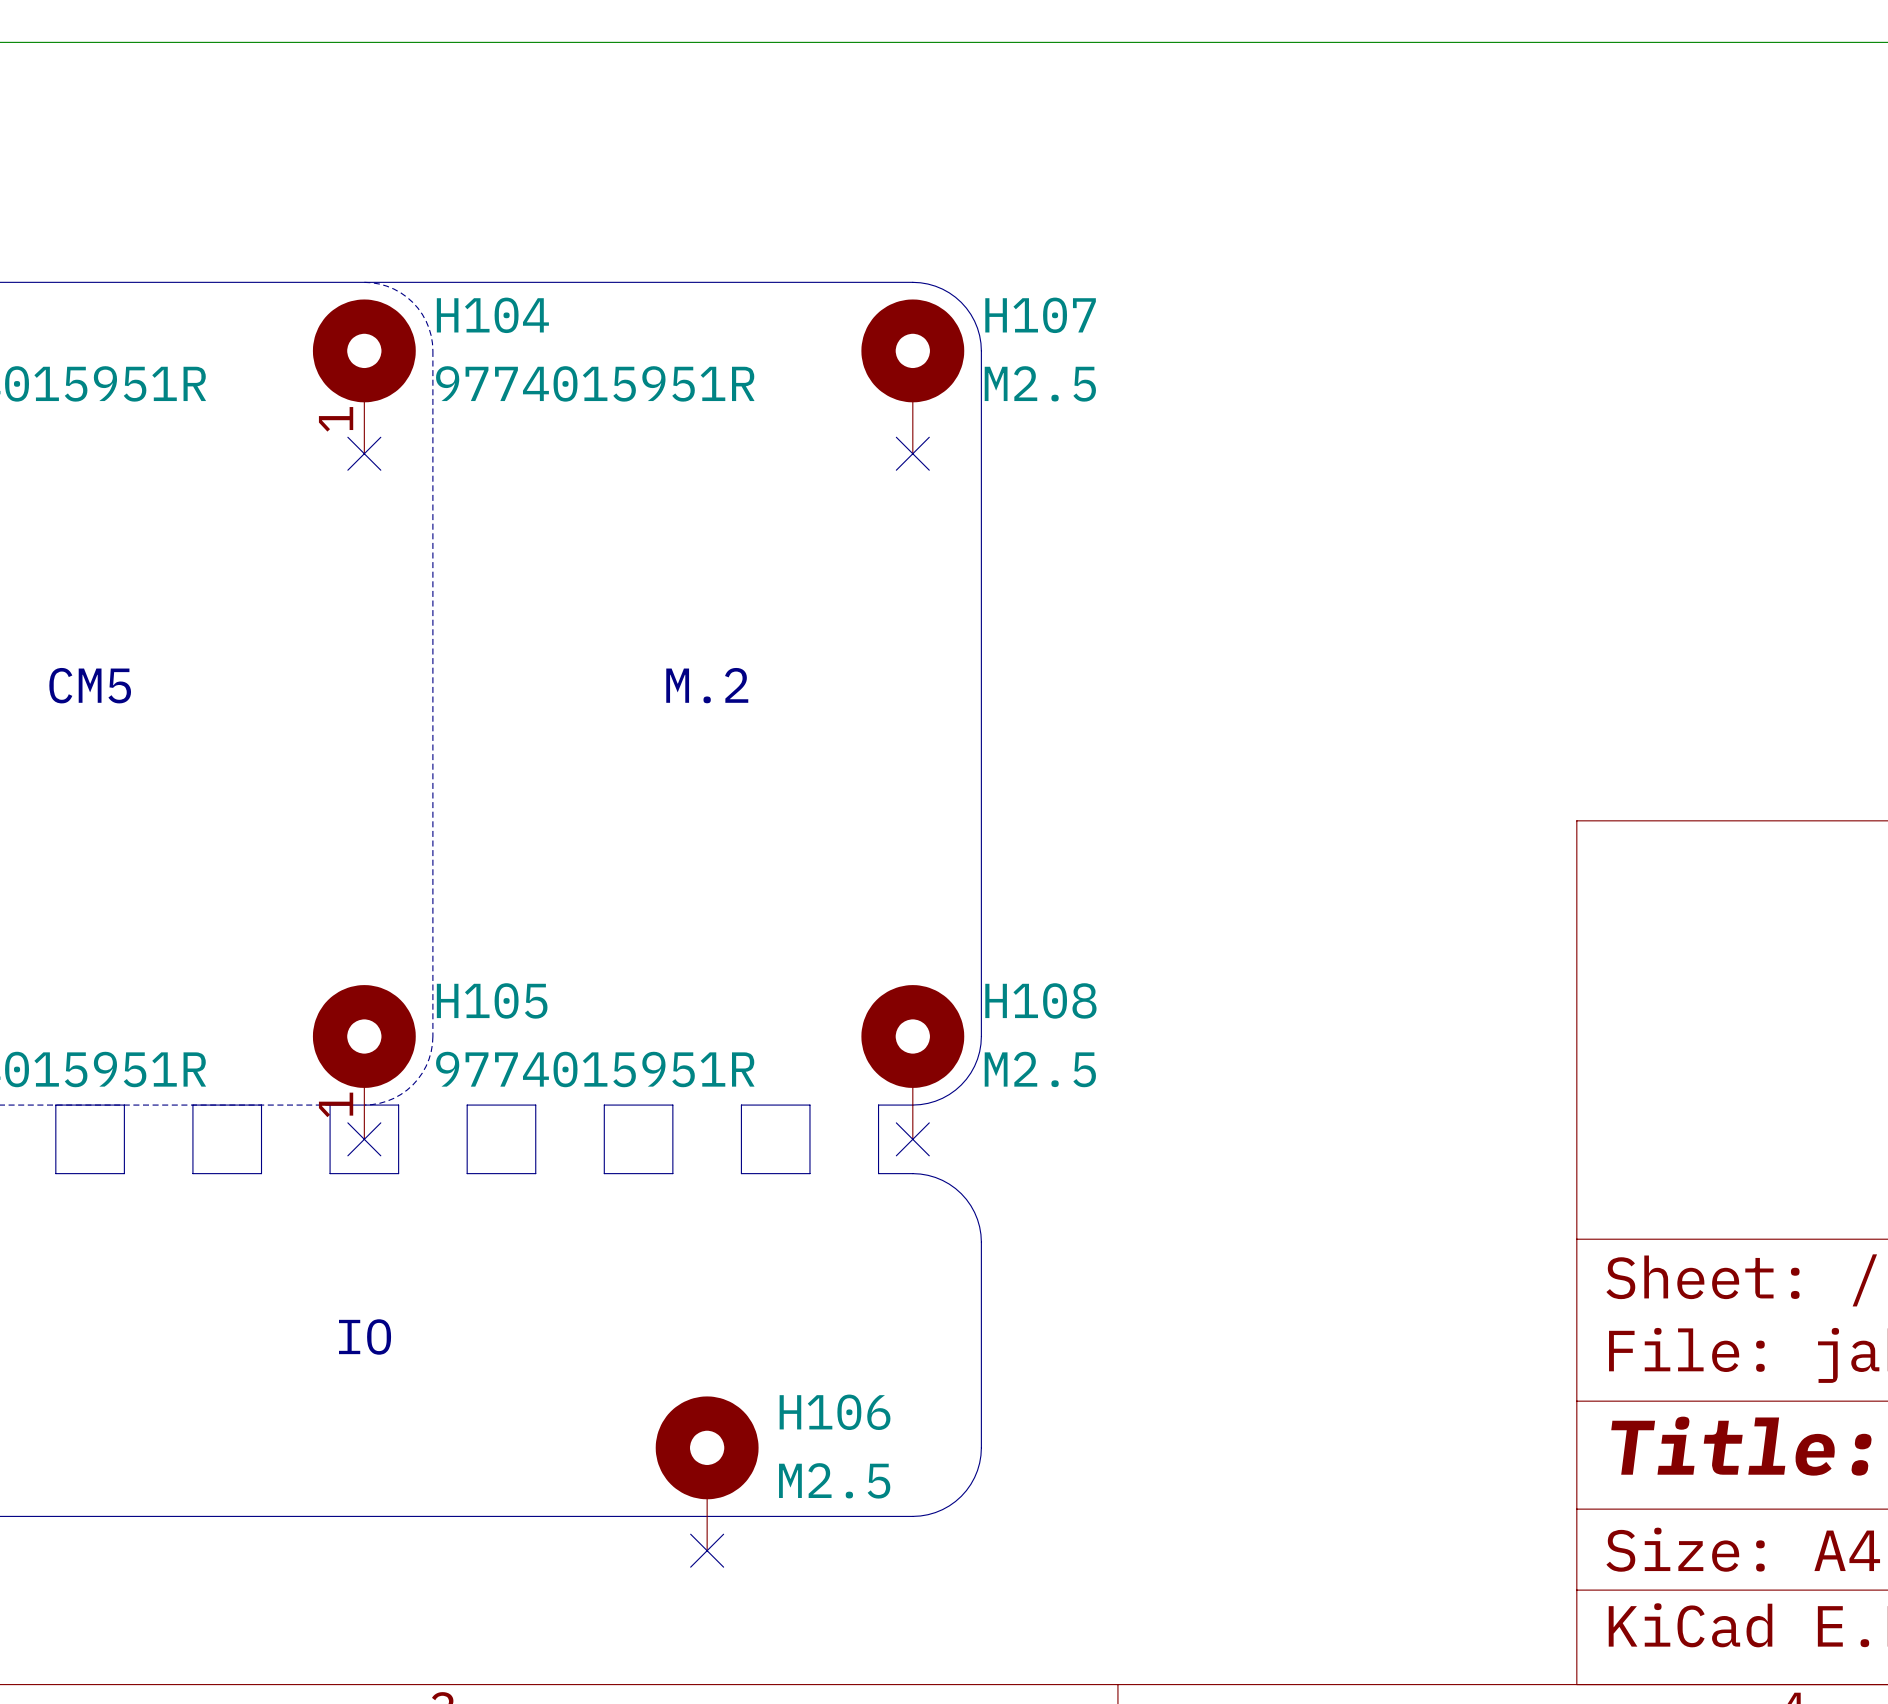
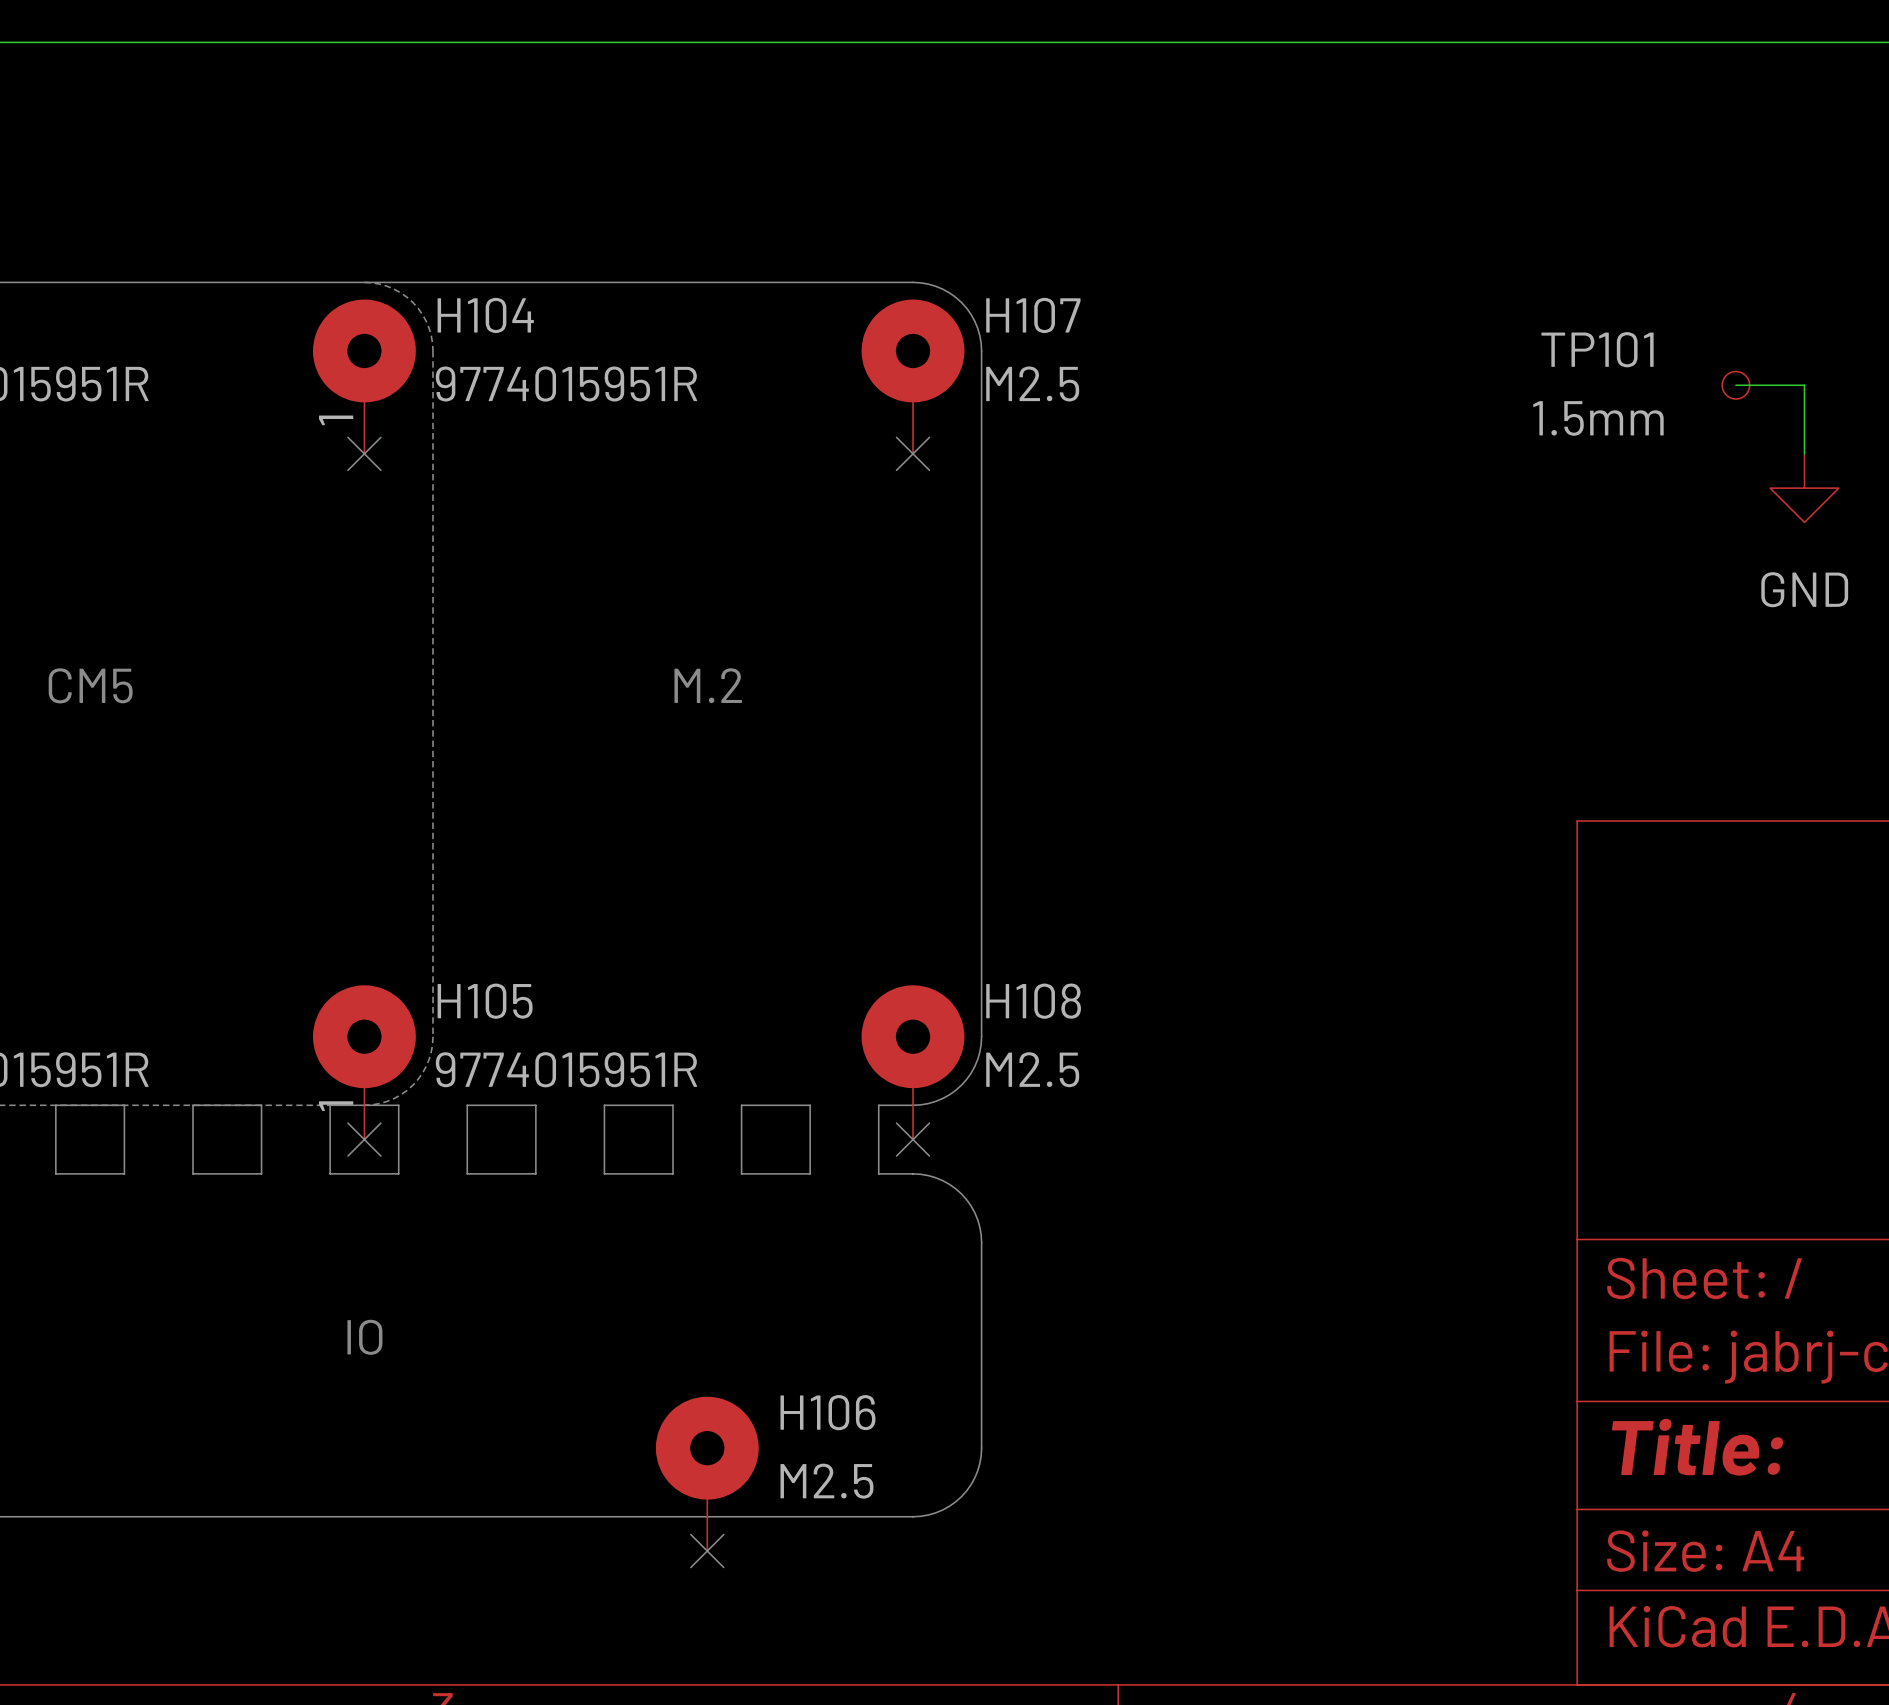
wire: none -> (1735, 385) (1804, 385) (1804, 453)
TP101: none -> 1.5mm (1735, 385)
power symbol: none -> GND (1804, 488)

